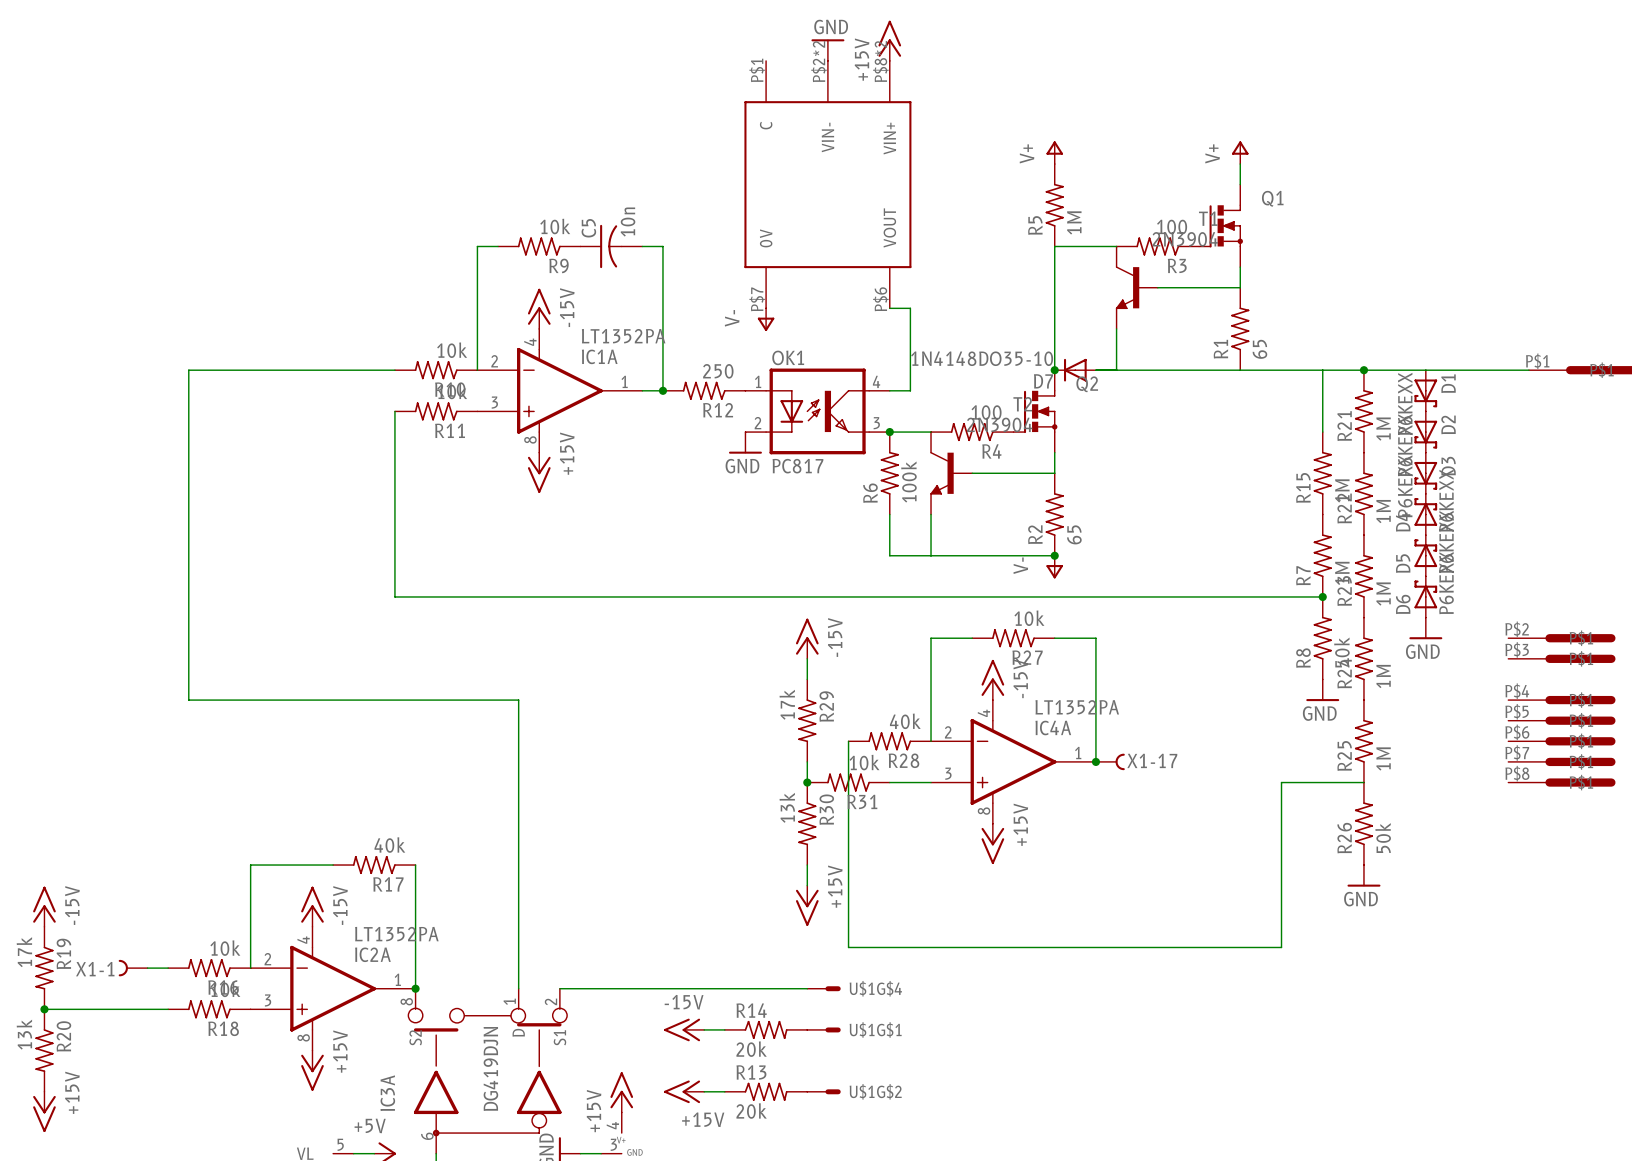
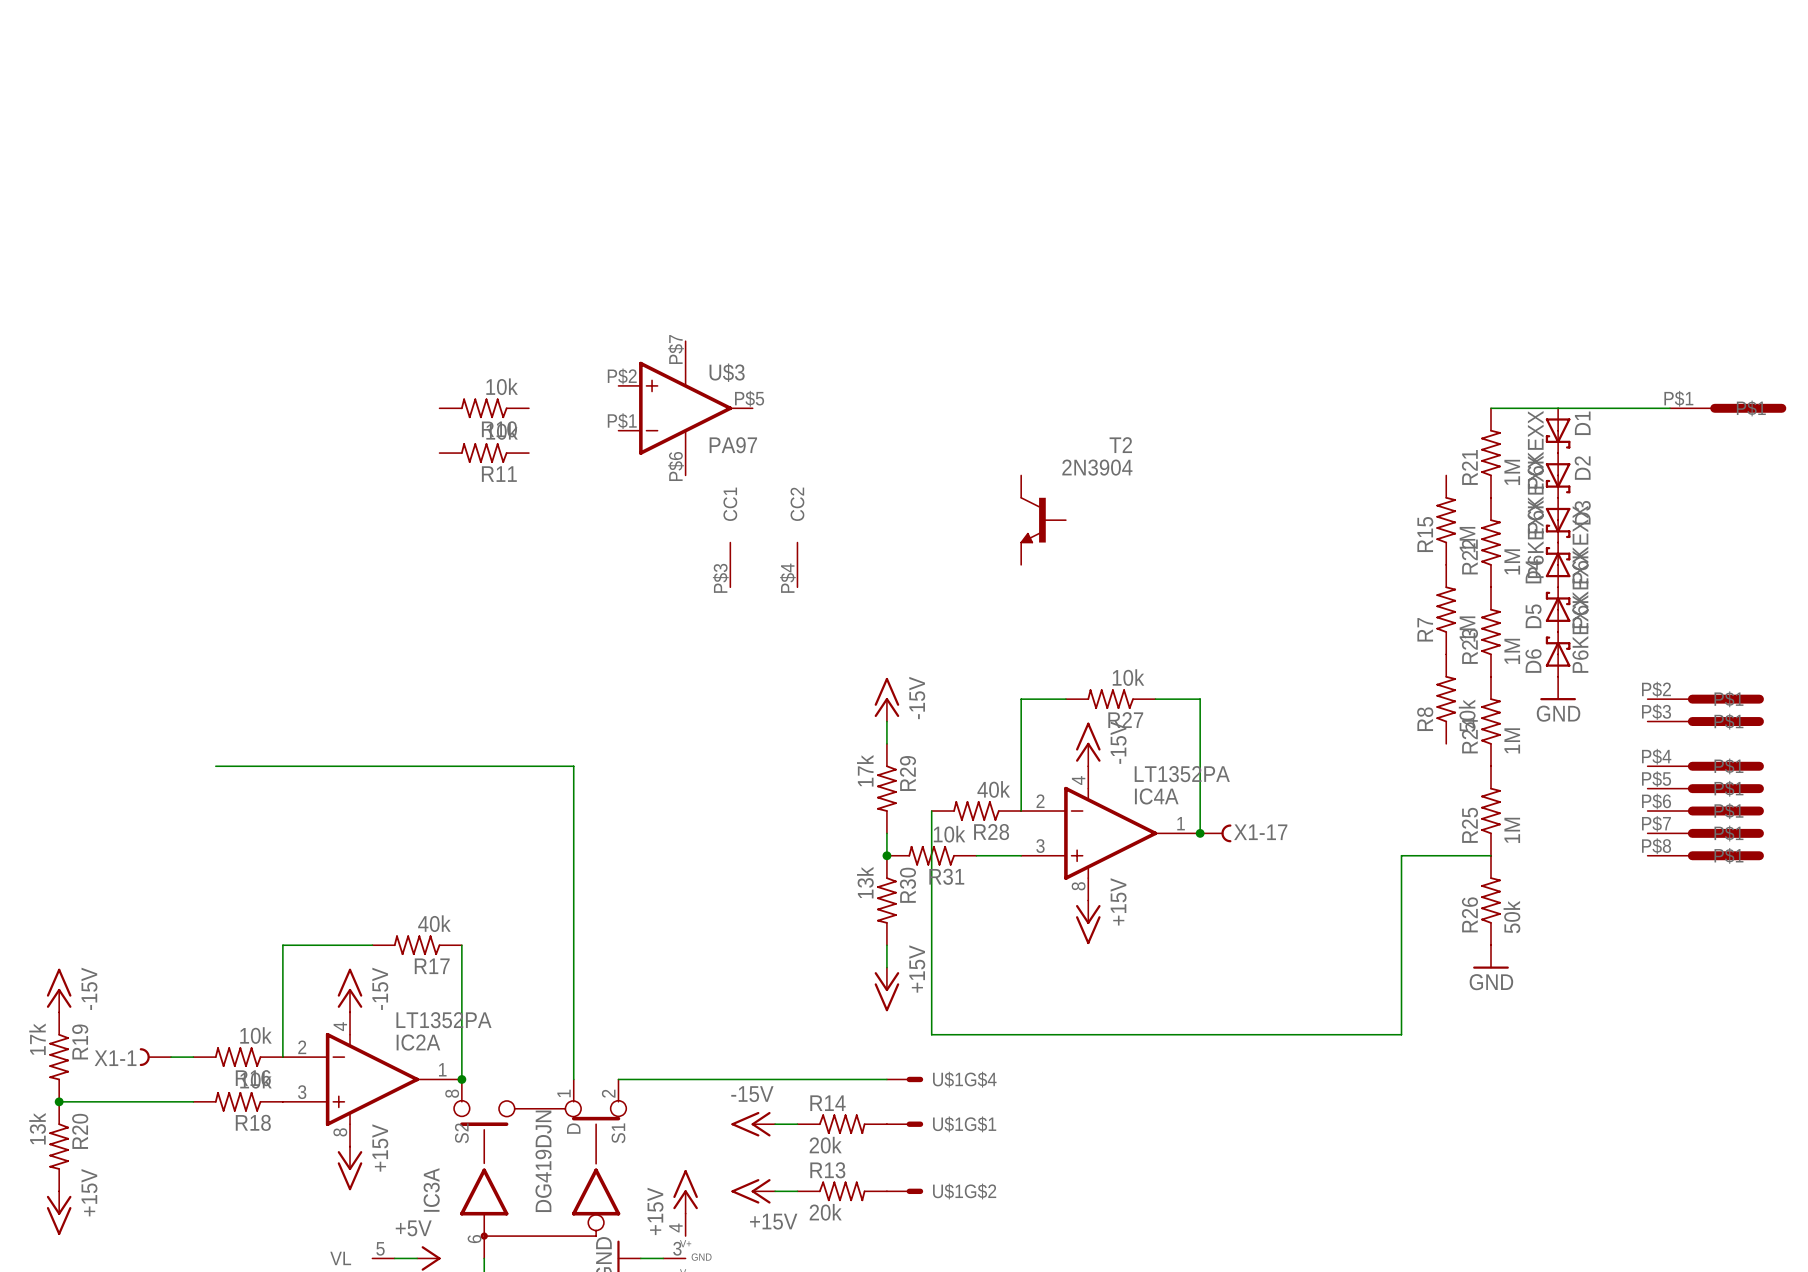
power symbol: +15V (889, 40) -> none
power symbol: GND (827, 50) -> none
power symbol: V+ (1054, 152) -> none
power symbol: V+ (1240, 152) -> none
wire: (1240, 164) (1240, 184) -> none
part: (827, 184) -> none
R5: 1M (1054, 205) -> none
Q1: (1220, 225) -> none
wire: (498, 246) (477, 246) (477, 370) -> none
R9: 10k (539, 246) -> none
C5: 10n (611, 246) -> none
wire: (642, 246) (662, 246) (662, 390) (642, 390) -> none
wire: (1116, 246) (1054, 246) (1054, 370) -> none
R3: 100 (1157, 246) -> none
wire: (1240, 267) (1240, 287) (1157, 287) -> none
T1: 2N3904 (1136, 287) -> none
power symbol: -15V (539, 308) -> none
wire: (889, 308) (910, 308) (910, 390) (889, 390) -> none
power symbol: V- (766, 319) -> none
wire: (1116, 328) (1116, 370) -> none
R1: 65 (1240, 328) -> none
wire: (394, 370) (188, 370) (188, 700) -> none
junction: (1054, 370) -> none
D7: 1N4148DO35-10 (1075, 370) -> none
wire: (1095, 370) (1363, 370) -> none
wire: (1322, 370) (1322, 432) -> none
junction: (1363, 370) -> none
IC1A: LT1352PA (559, 390) -> none
junction: (662, 390) -> none
R12: 250 (704, 390) -> none
wire: (394, 411) (394, 596) (1322, 596) -> none
OK1: PC817 (817, 411) -> none
Q2: (1035, 411) -> none
U$3: none -> PA97 (707, 464)
wire: (889, 432) (931, 432) -> none
junction: (889, 432) -> none
R4: 100 (972, 432) -> none
power symbol: GND (745, 442) -> none
wire: (1054, 452) (1054, 473) (972, 473) -> none
power symbol: +15V (539, 472) -> none
R6: 100k (889, 473) -> none
wire: (889, 514) (889, 555) (1054, 555) -> none
wire: (931, 514) (931, 555) -> none
R2: 65 (1054, 514) -> none
junction: (1054, 555) -> none
power symbol: V- (1054, 567) -> none
junction: (1322, 596) -> none
power symbol: GND (1322, 690) -> none

